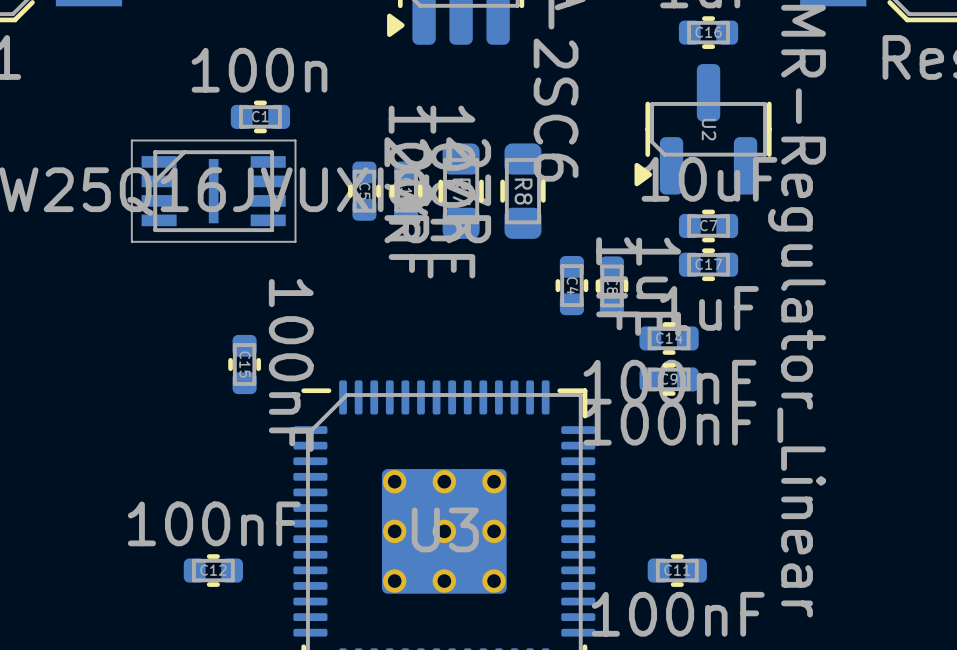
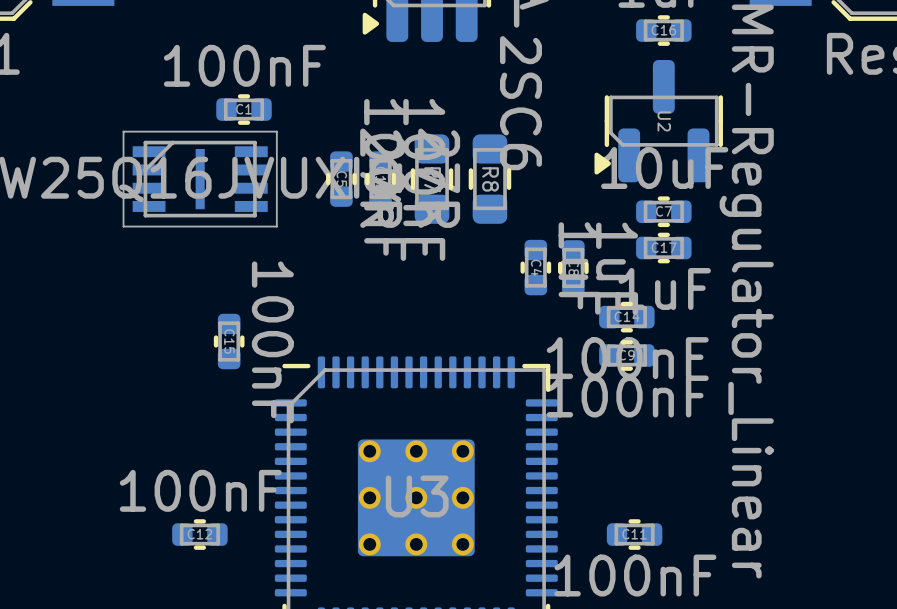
C1 value: 100n (259, 70) -> 100nF (244, 65)

